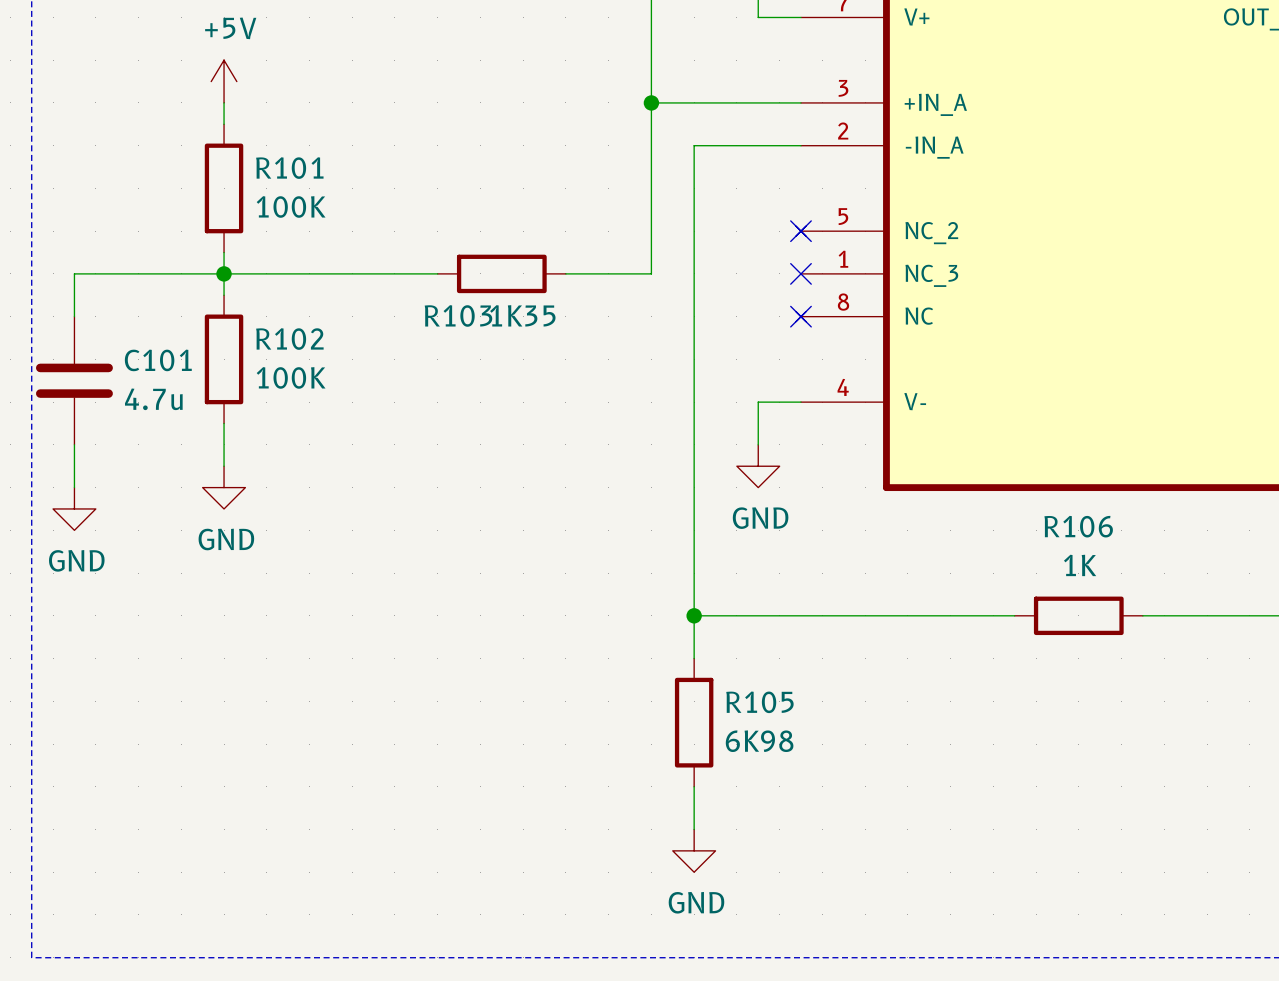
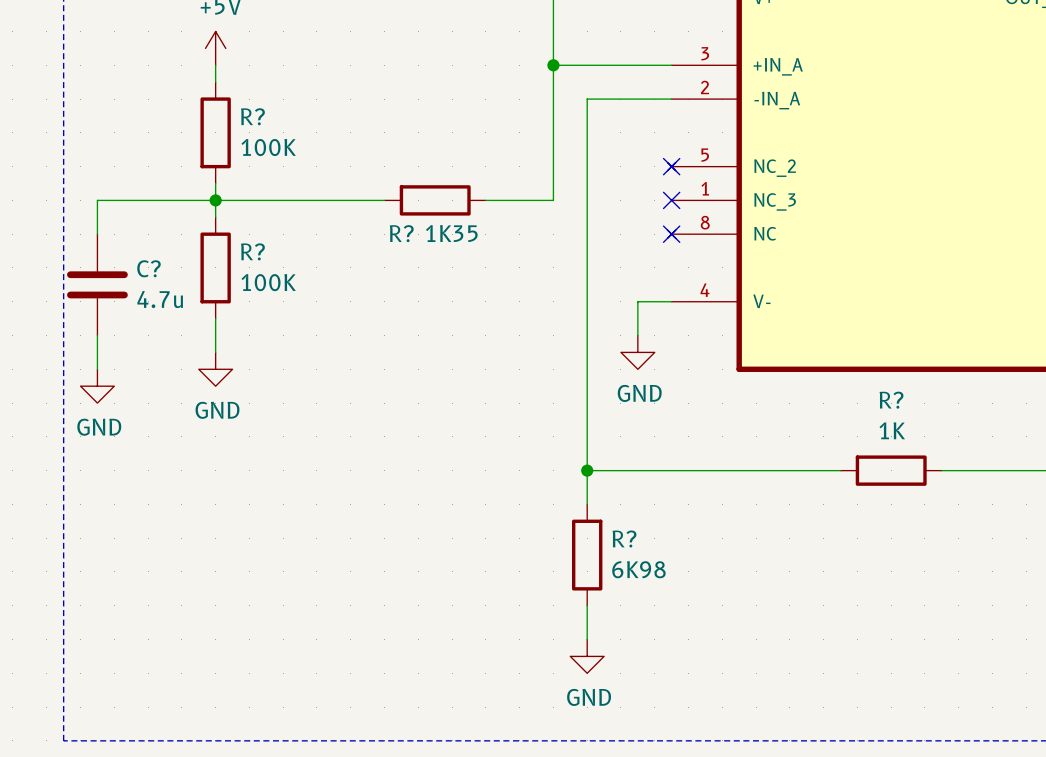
R101 name: R101 (289, 168) -> R? (252, 116)
R103 name: R103 (458, 315) -> R? (401, 233)
R102 name: R102 (289, 339) -> R? (252, 251)
C101 name: C101 (158, 360) -> C? (148, 268)
R106 name: R106 (1078, 526) -> R? (891, 400)
R105 name: R105 (759, 702) -> R? (624, 539)

